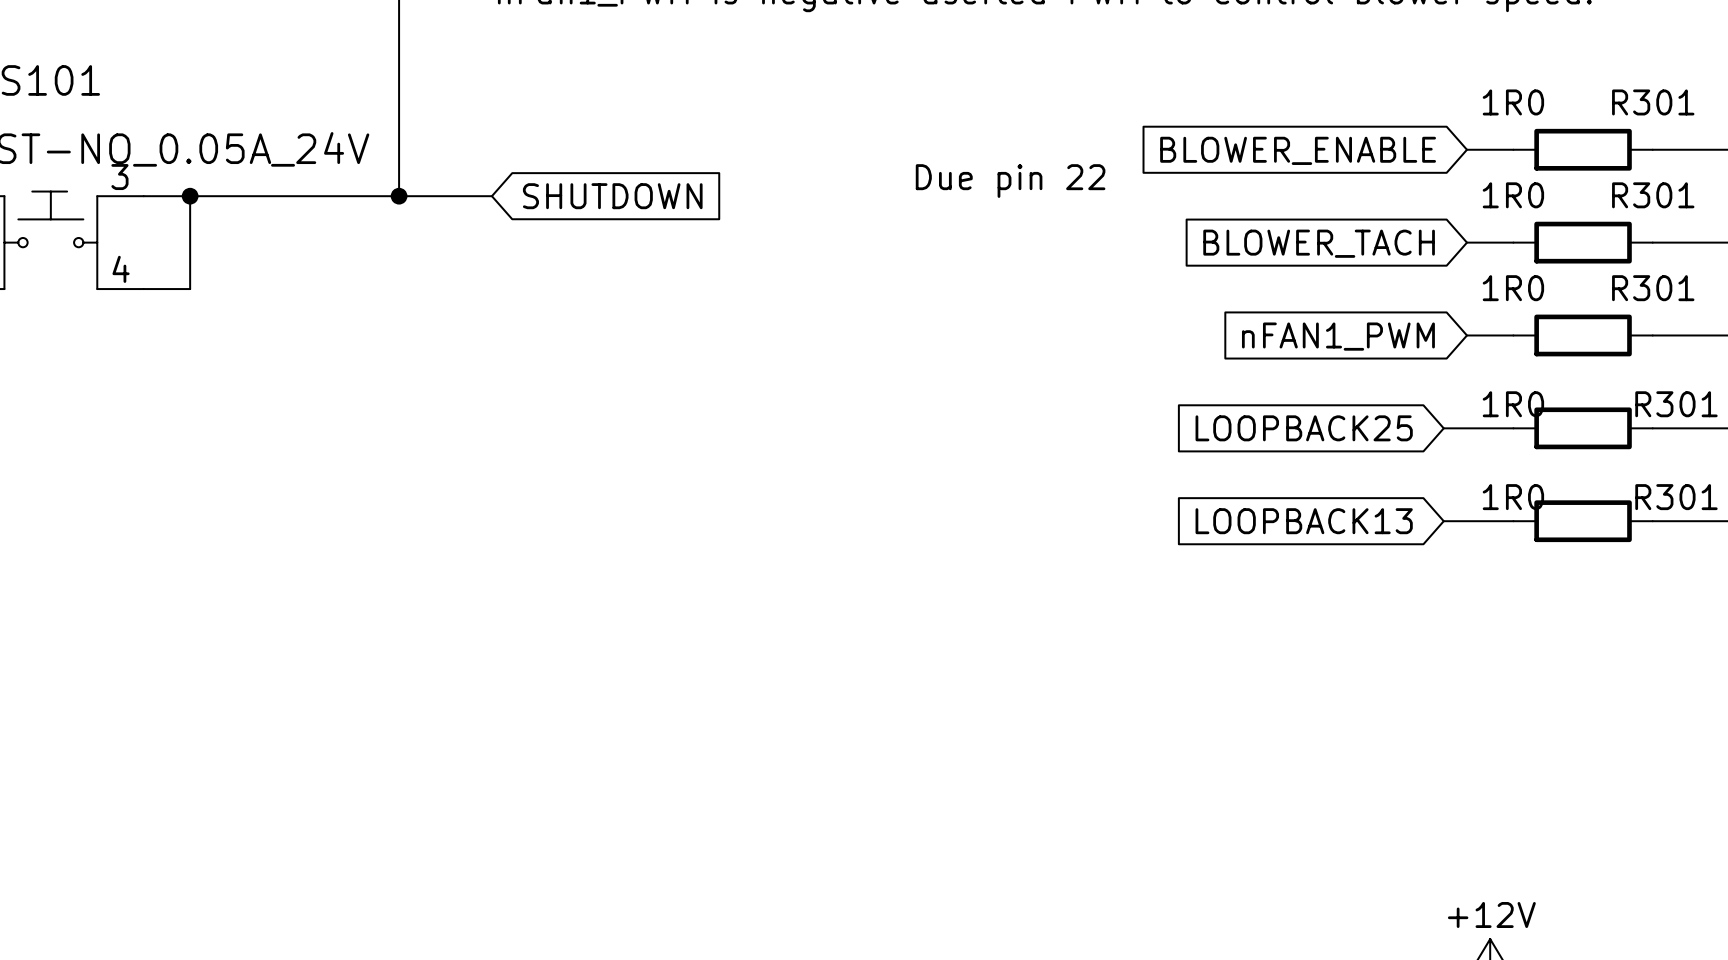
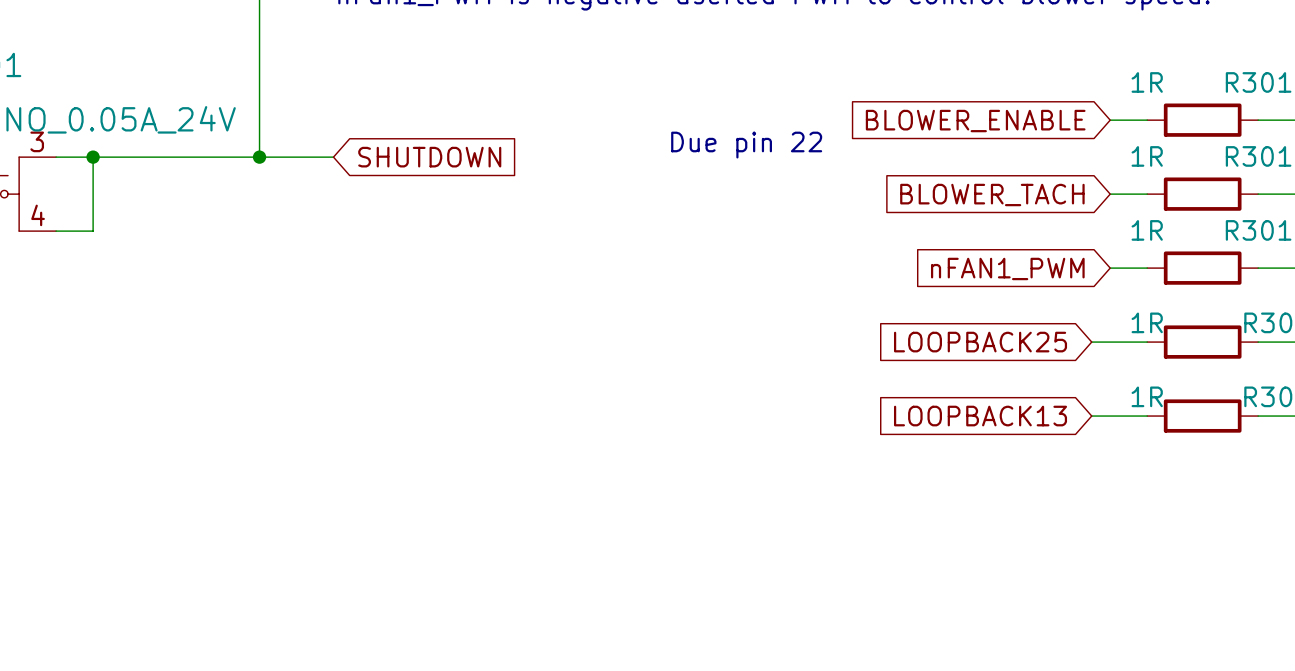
R301 value: 1R0 (1513, 102) -> 1R (1147, 82)
R301 value: 1R0 (1513, 195) -> 1R (1147, 156)
R301 value: 1R0 (1513, 288) -> 1R (1147, 230)
R301 value: 1R0 (1513, 404) -> 1R (1147, 322)
R301 value: 1R0 (1513, 497) -> 1R (1147, 396)

